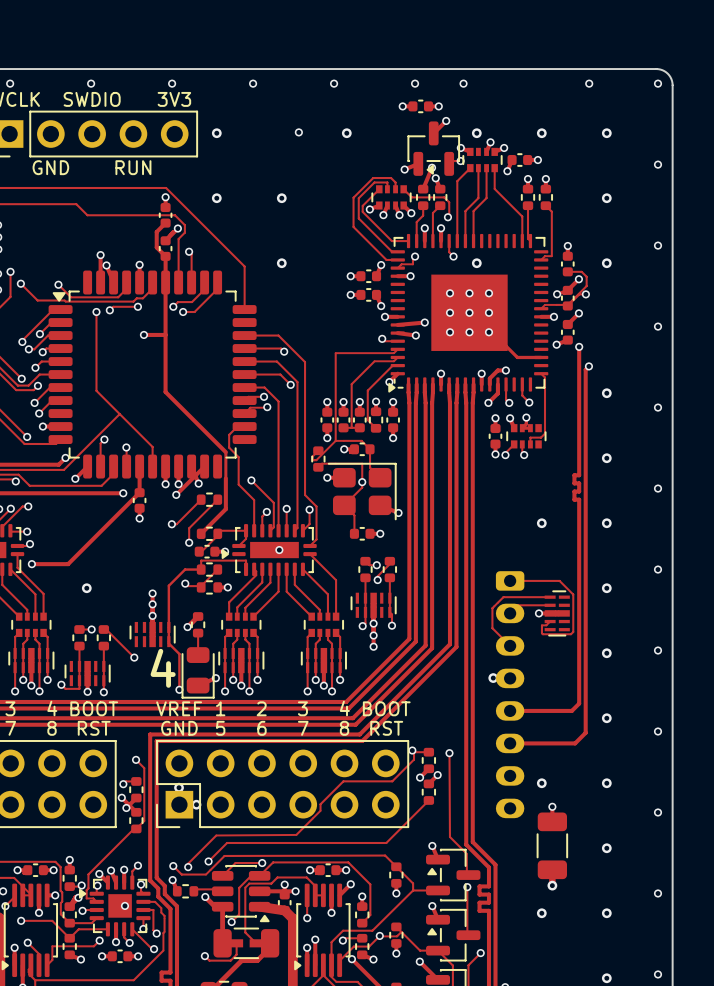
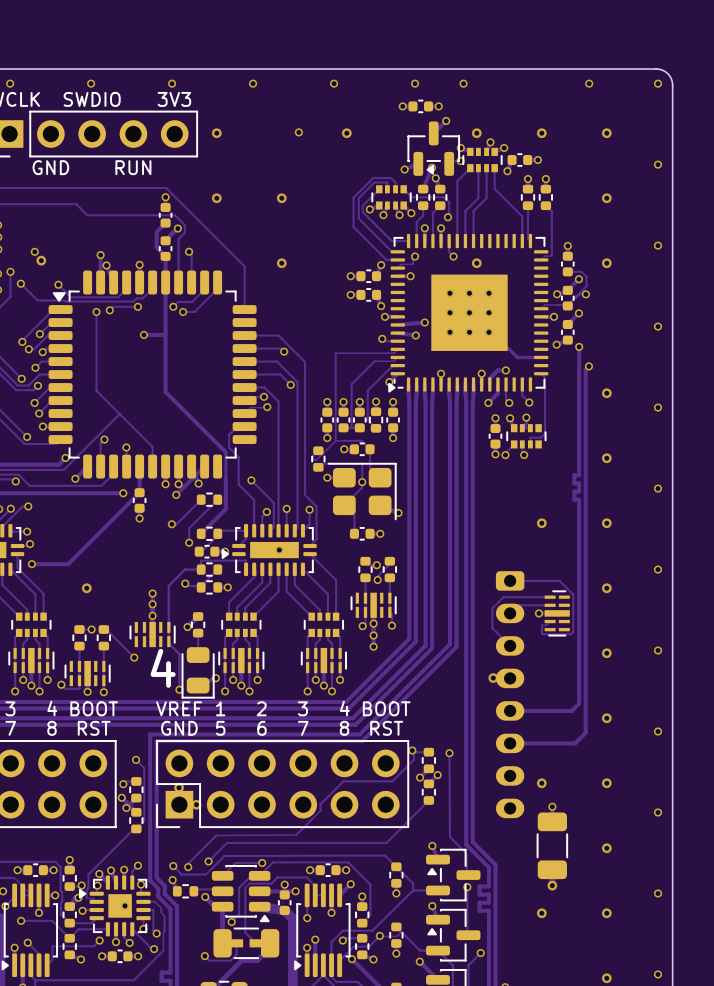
via: none -> (34, 251)
via: none -> (41, 260)

